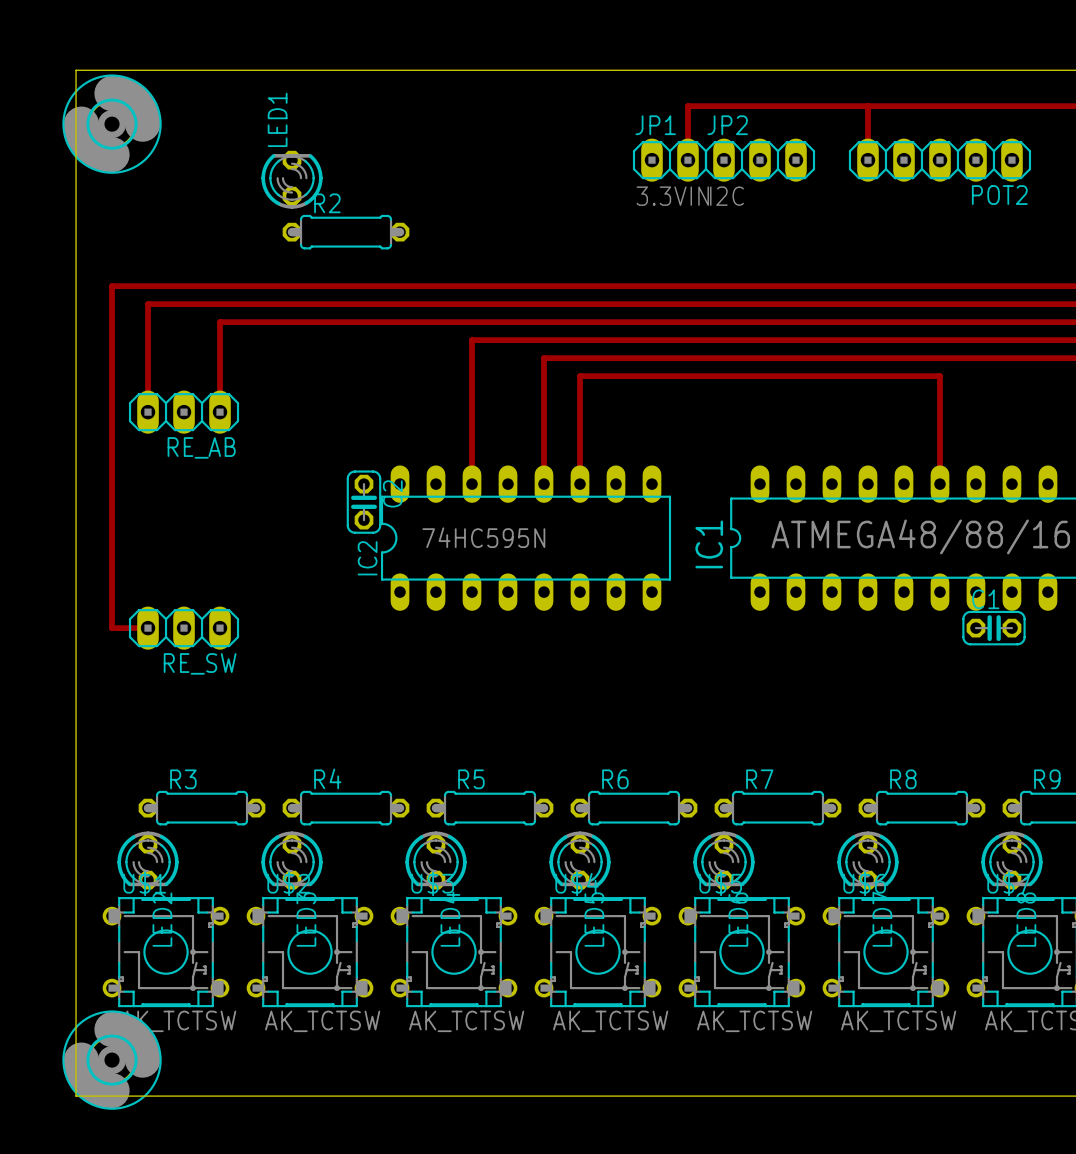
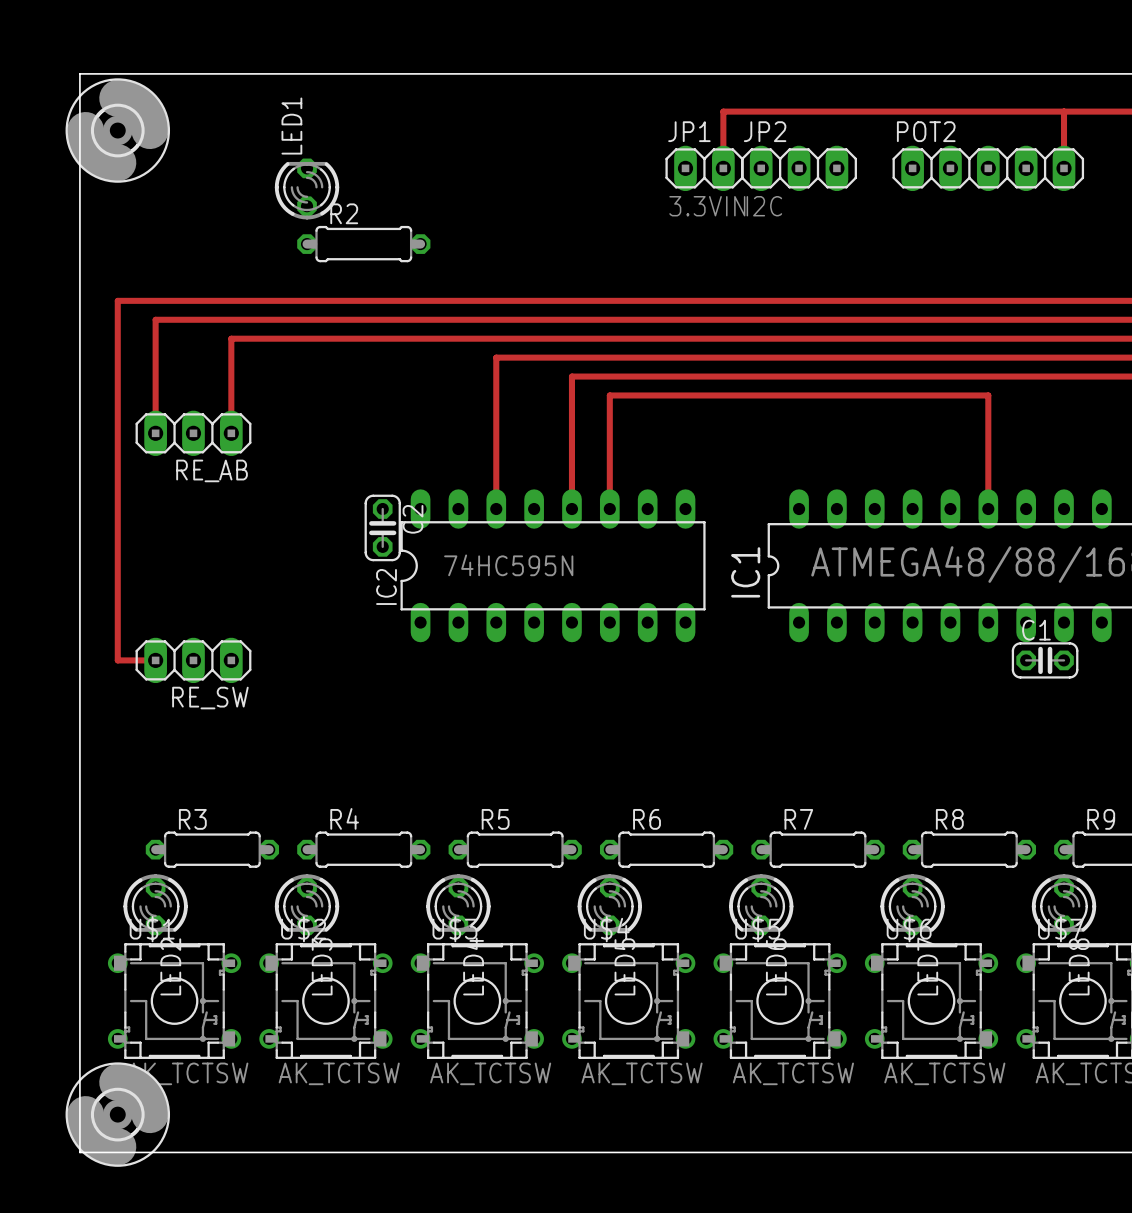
track: (867, 106) (867, 160) -> (1064, 111) (1064, 168)
POT2 name position: POT2 (999, 195) -> POT2 (926, 131)

